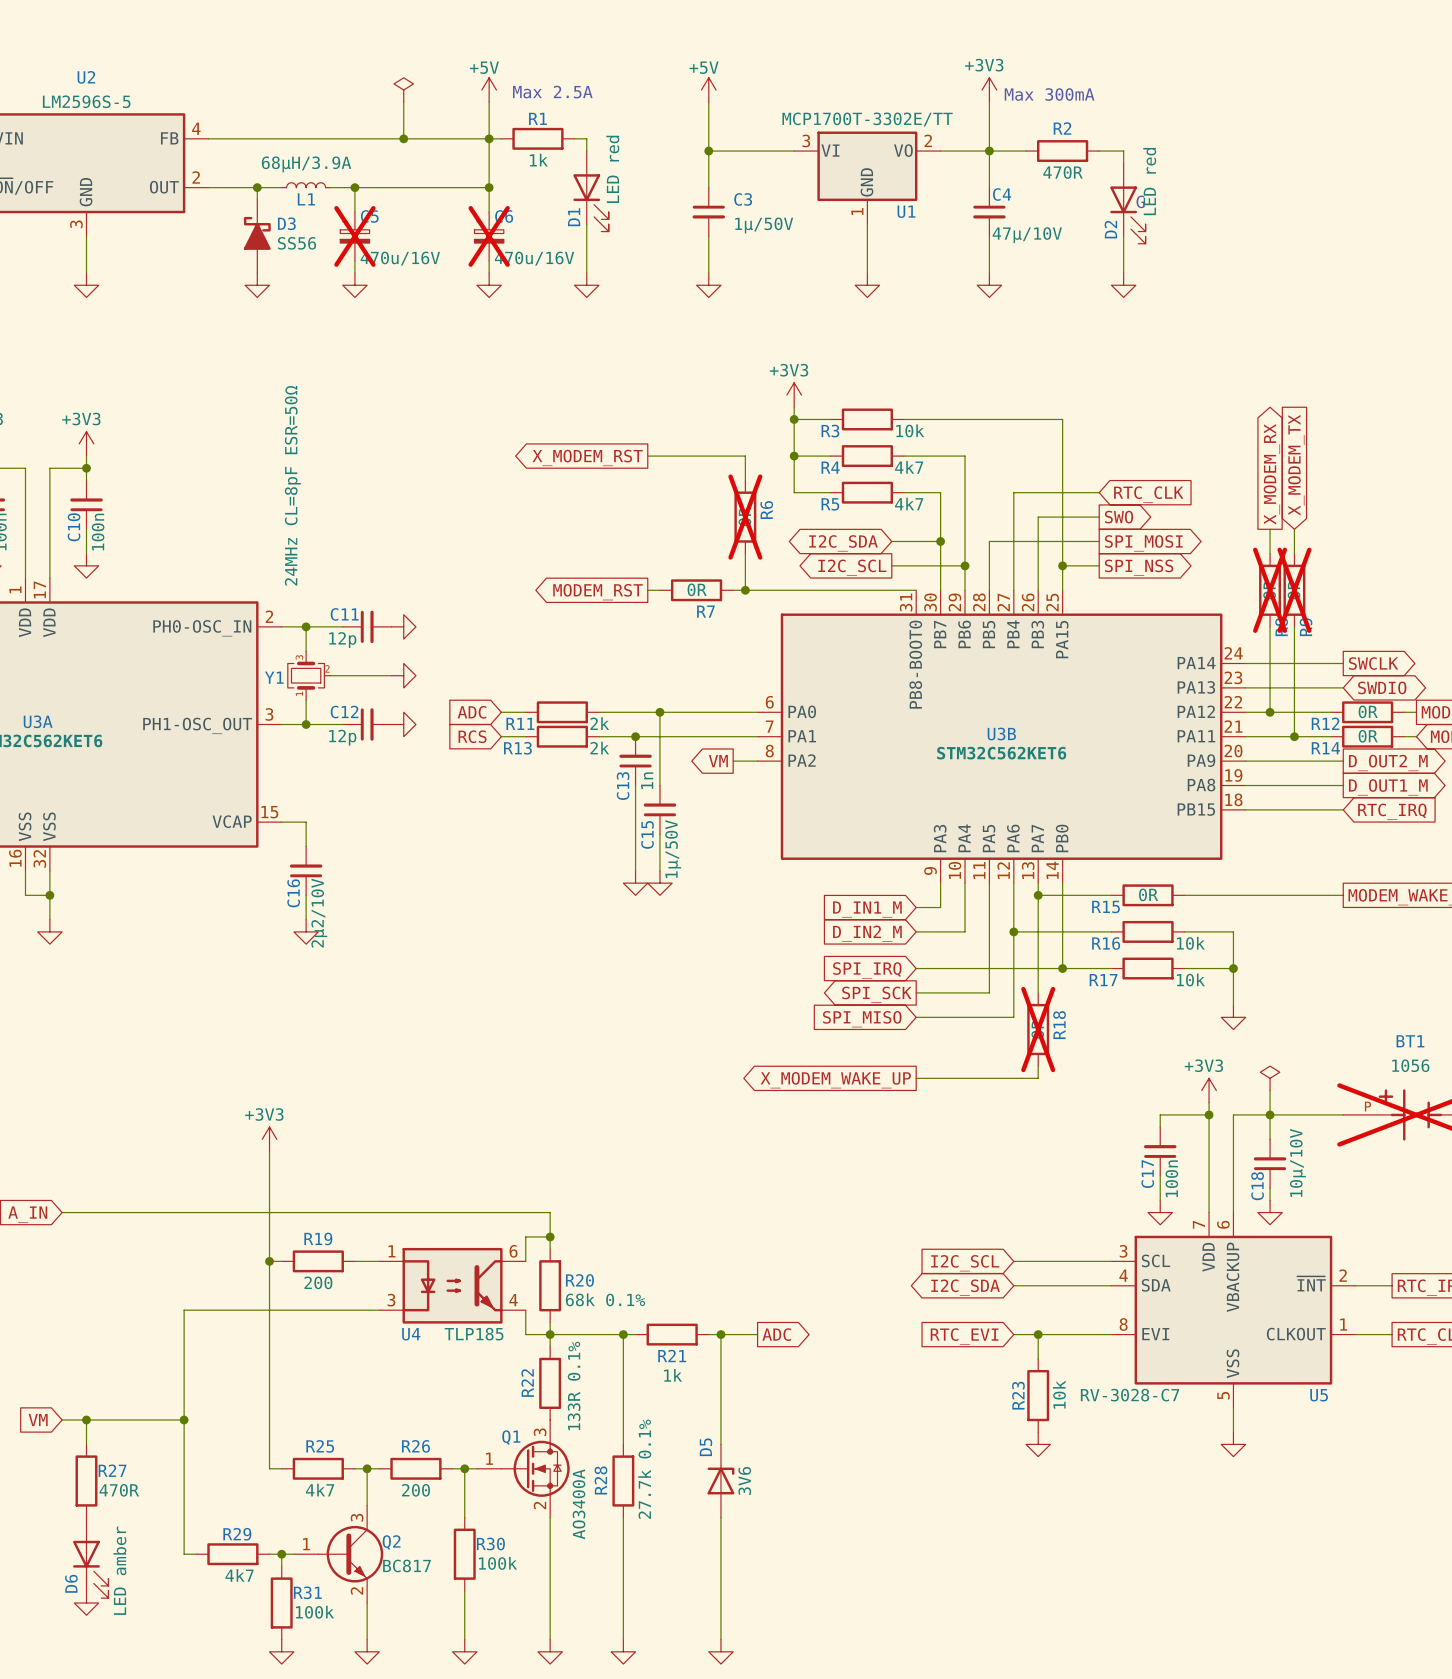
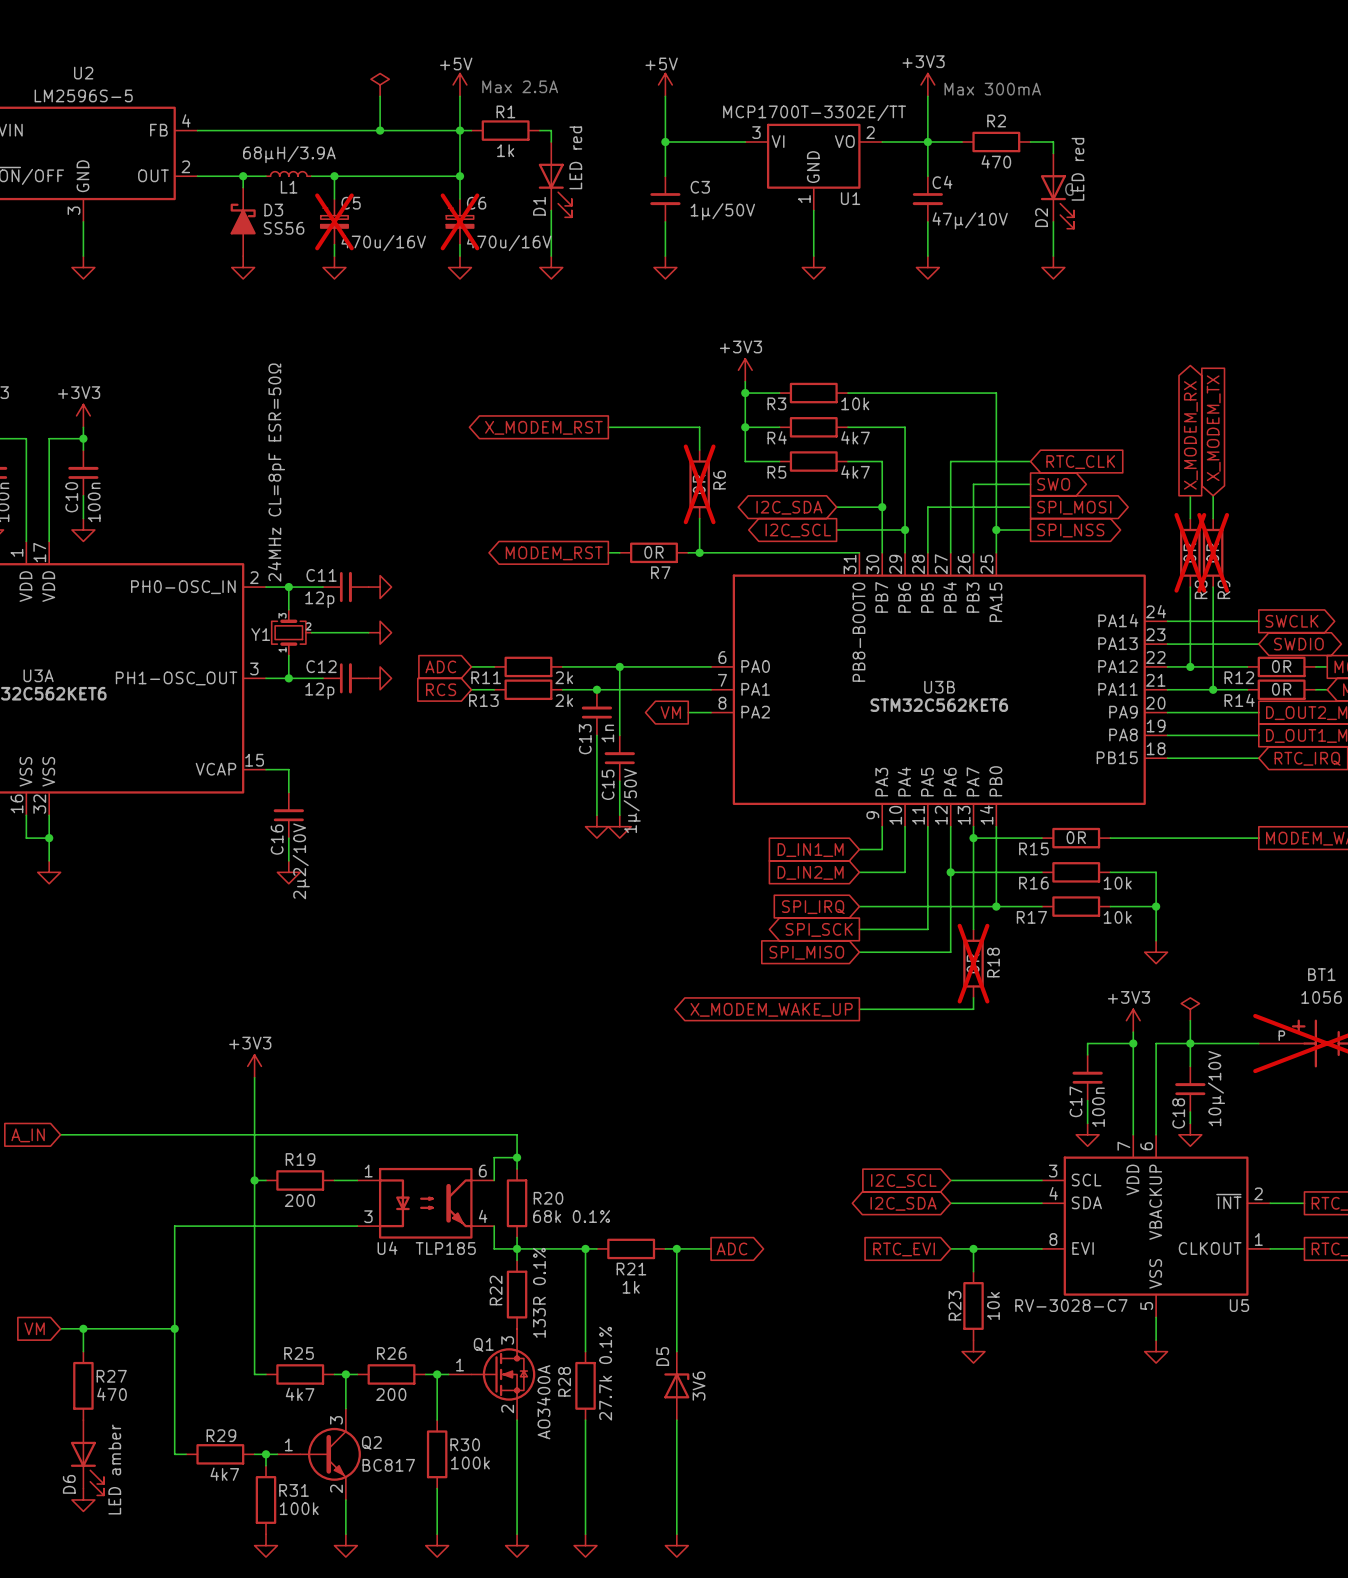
R2 value: 470R (1063, 172) -> 470 (996, 161)
R27 value: 470R (119, 1490) -> 470 (112, 1394)

